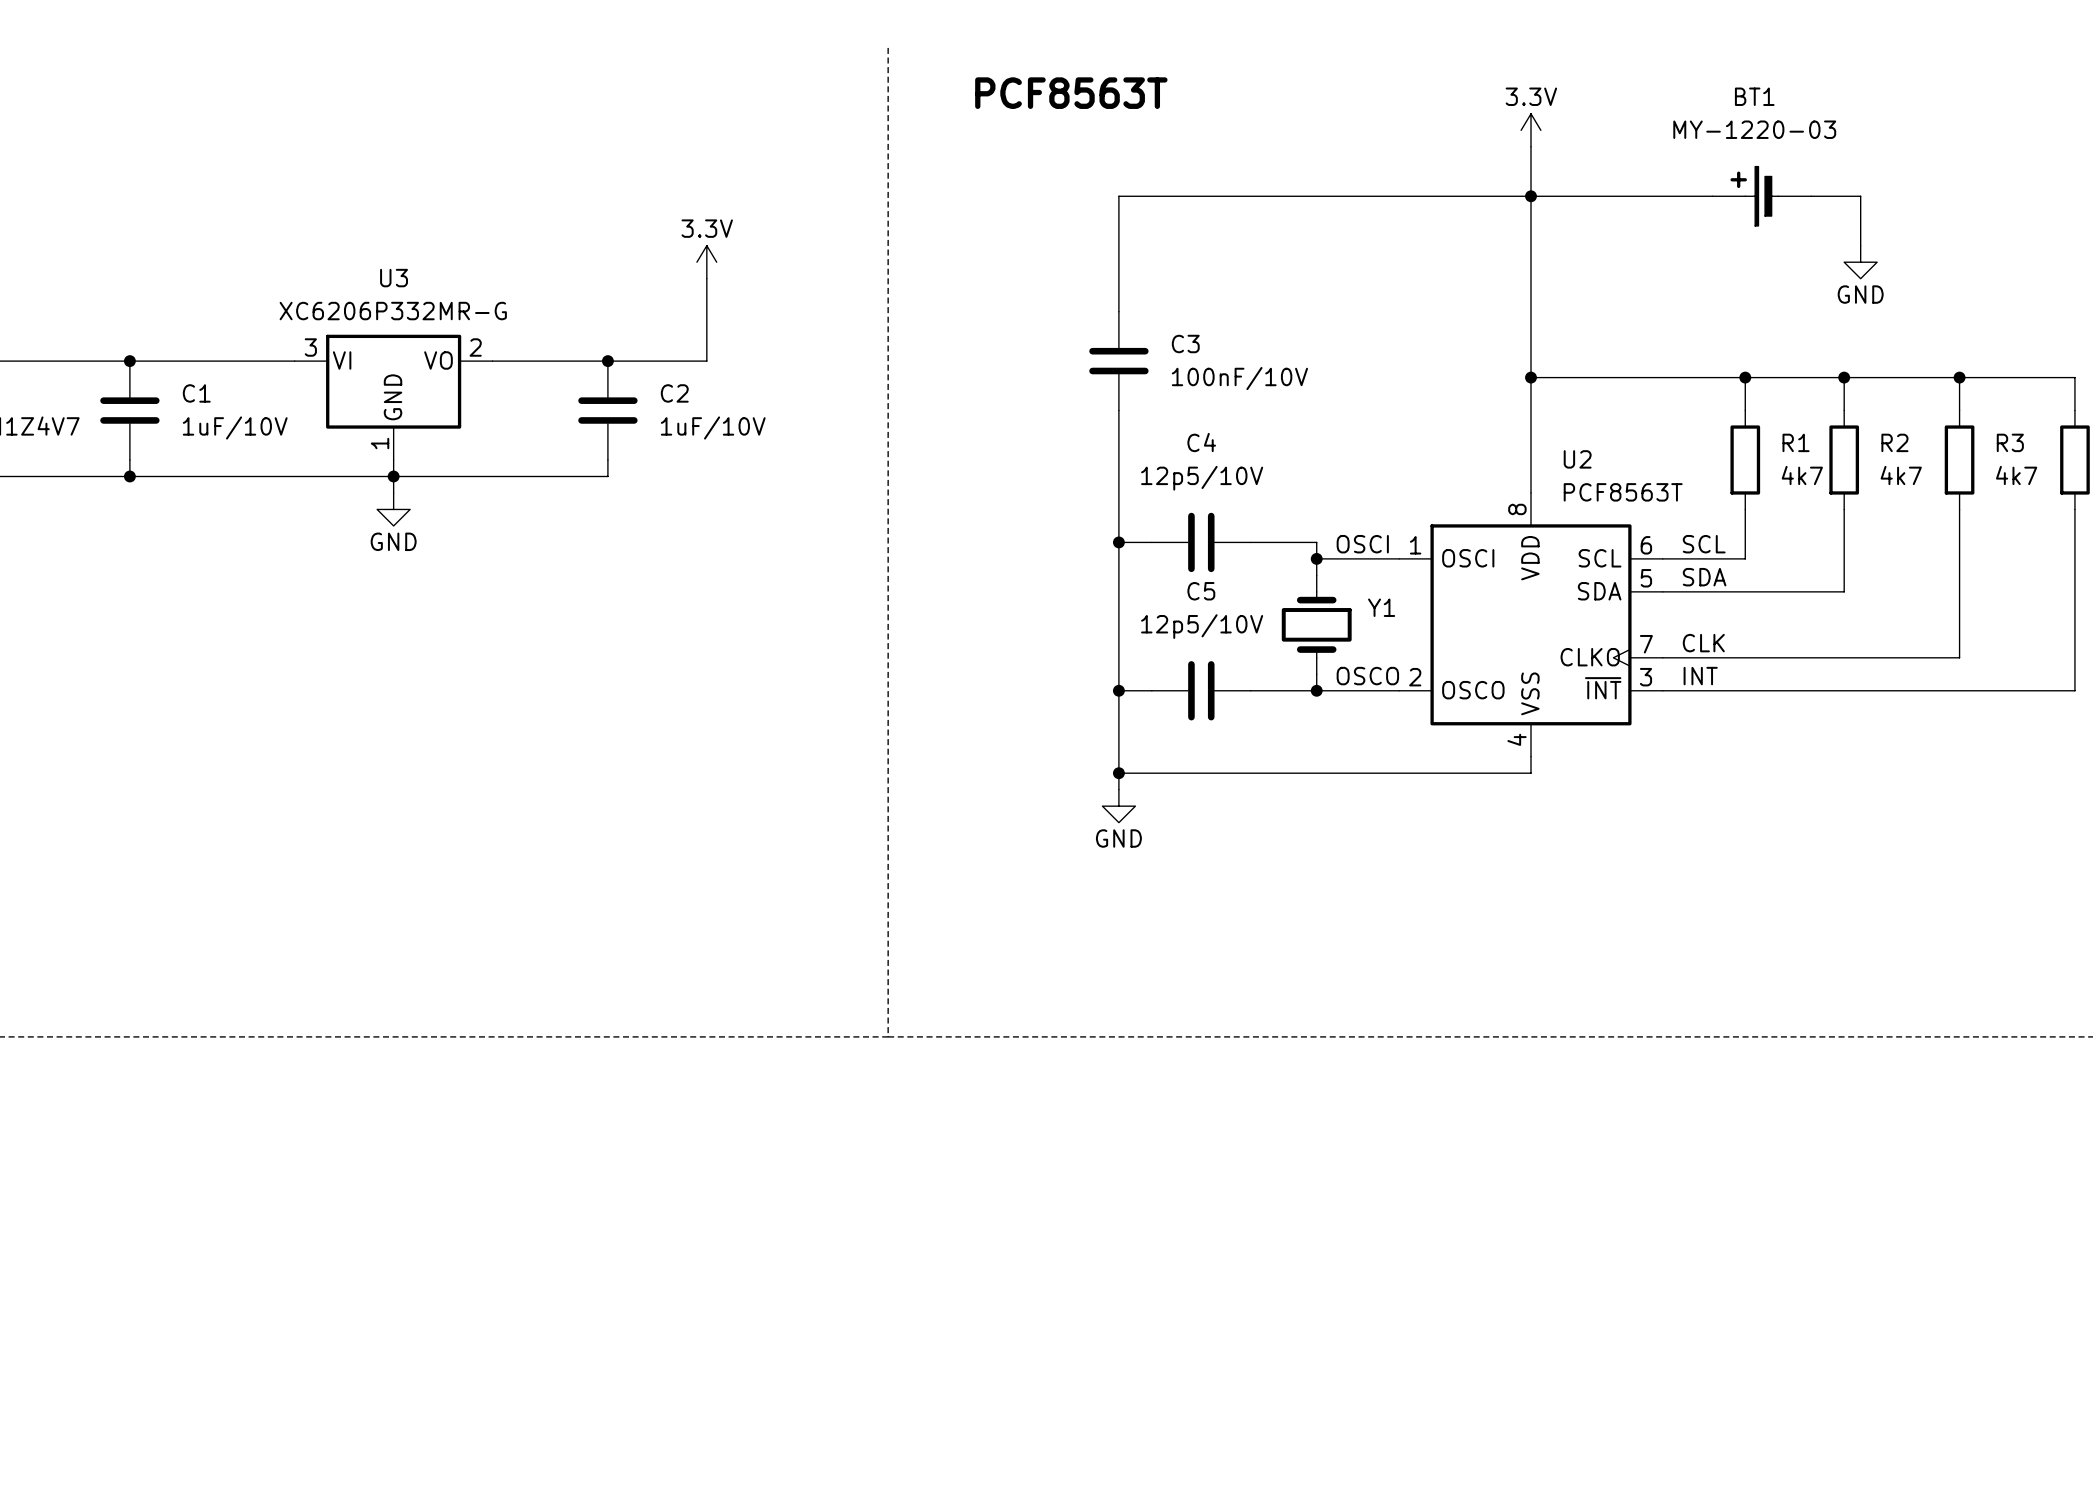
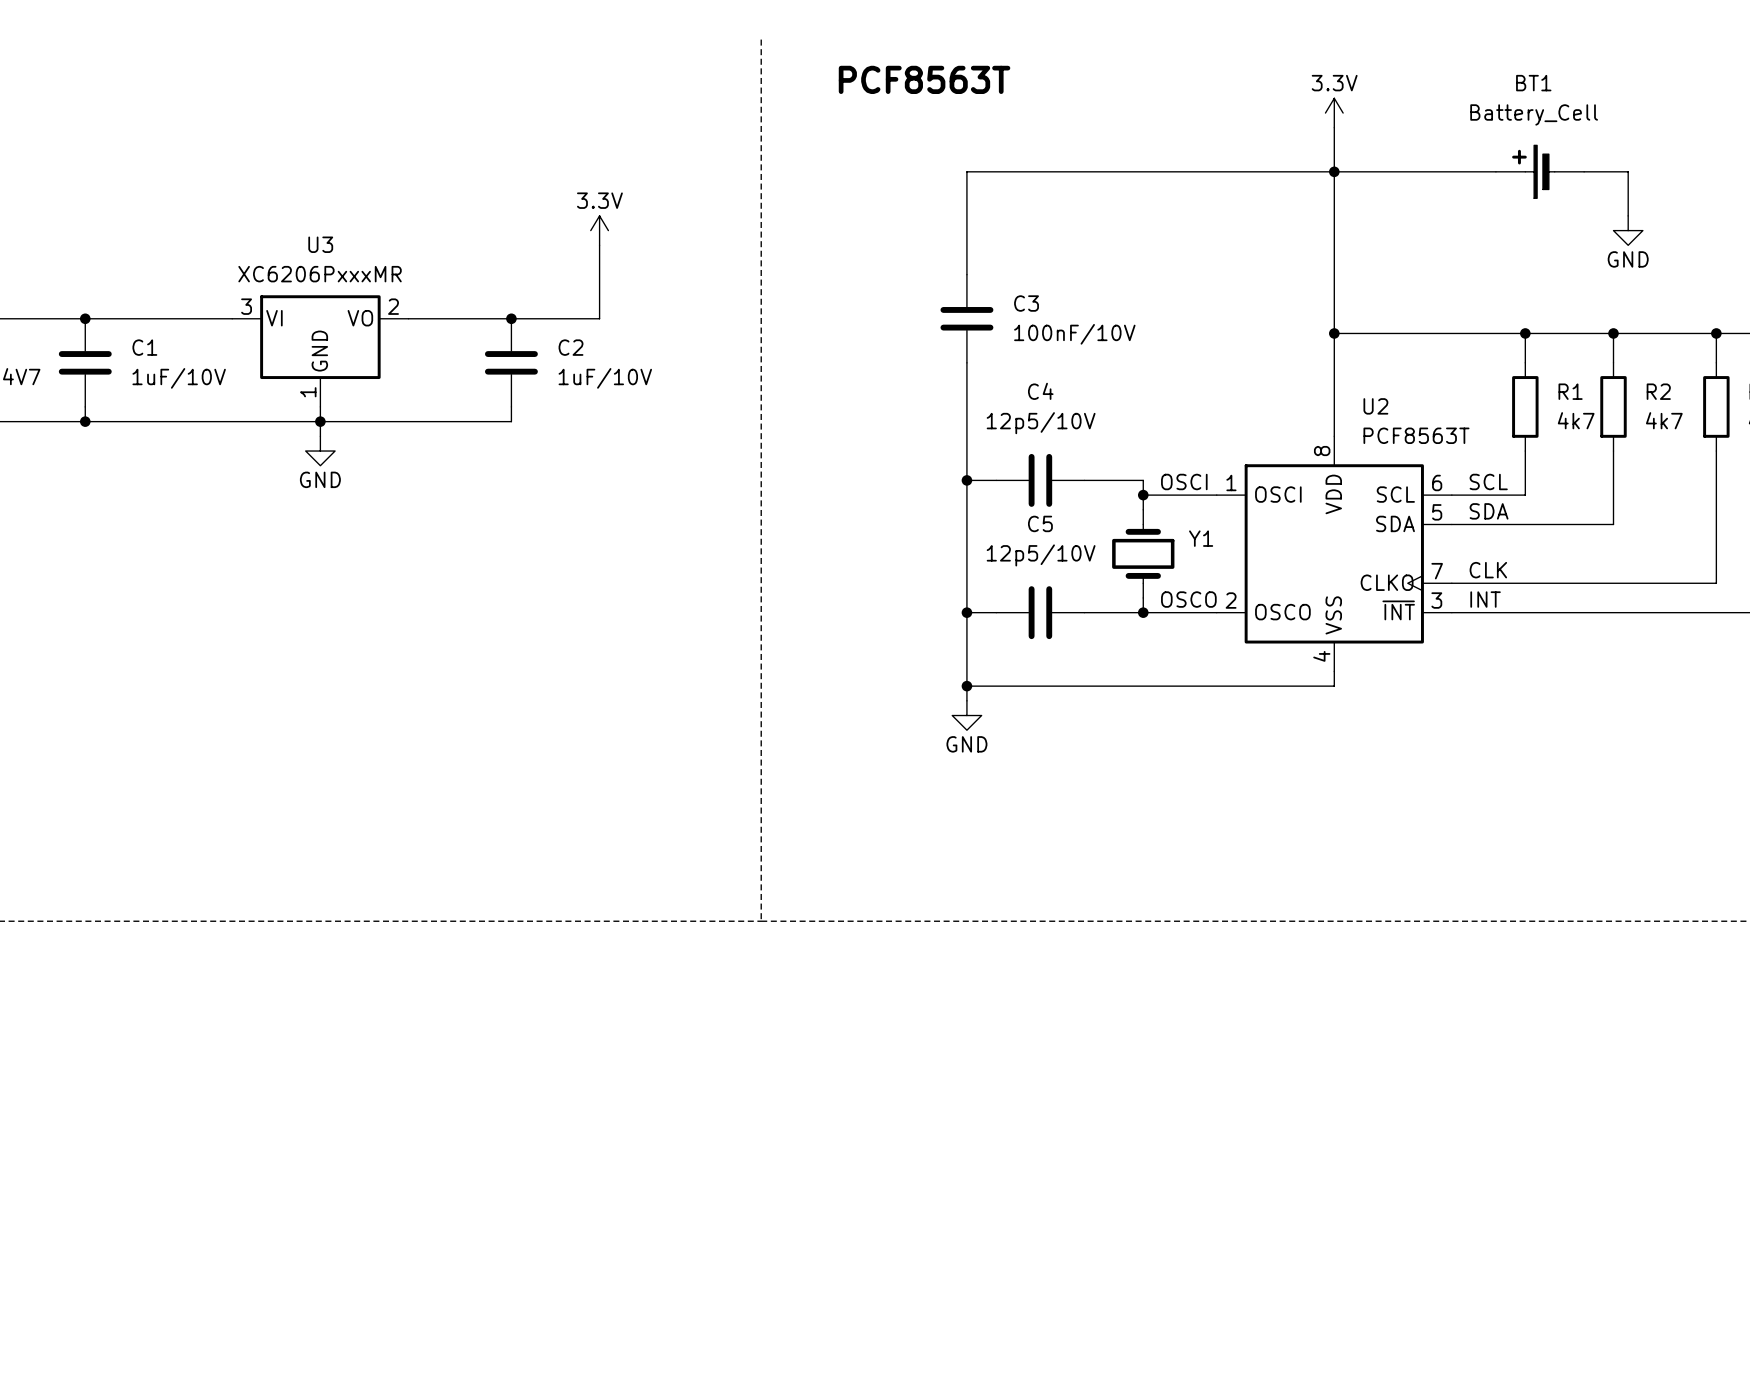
BT1 value: MY-1220-03 (1754, 129) -> Battery_Cell (1534, 114)
U3 value: XC6206P332MR-G (393, 311) -> XC6206PxxxMR (320, 274)

